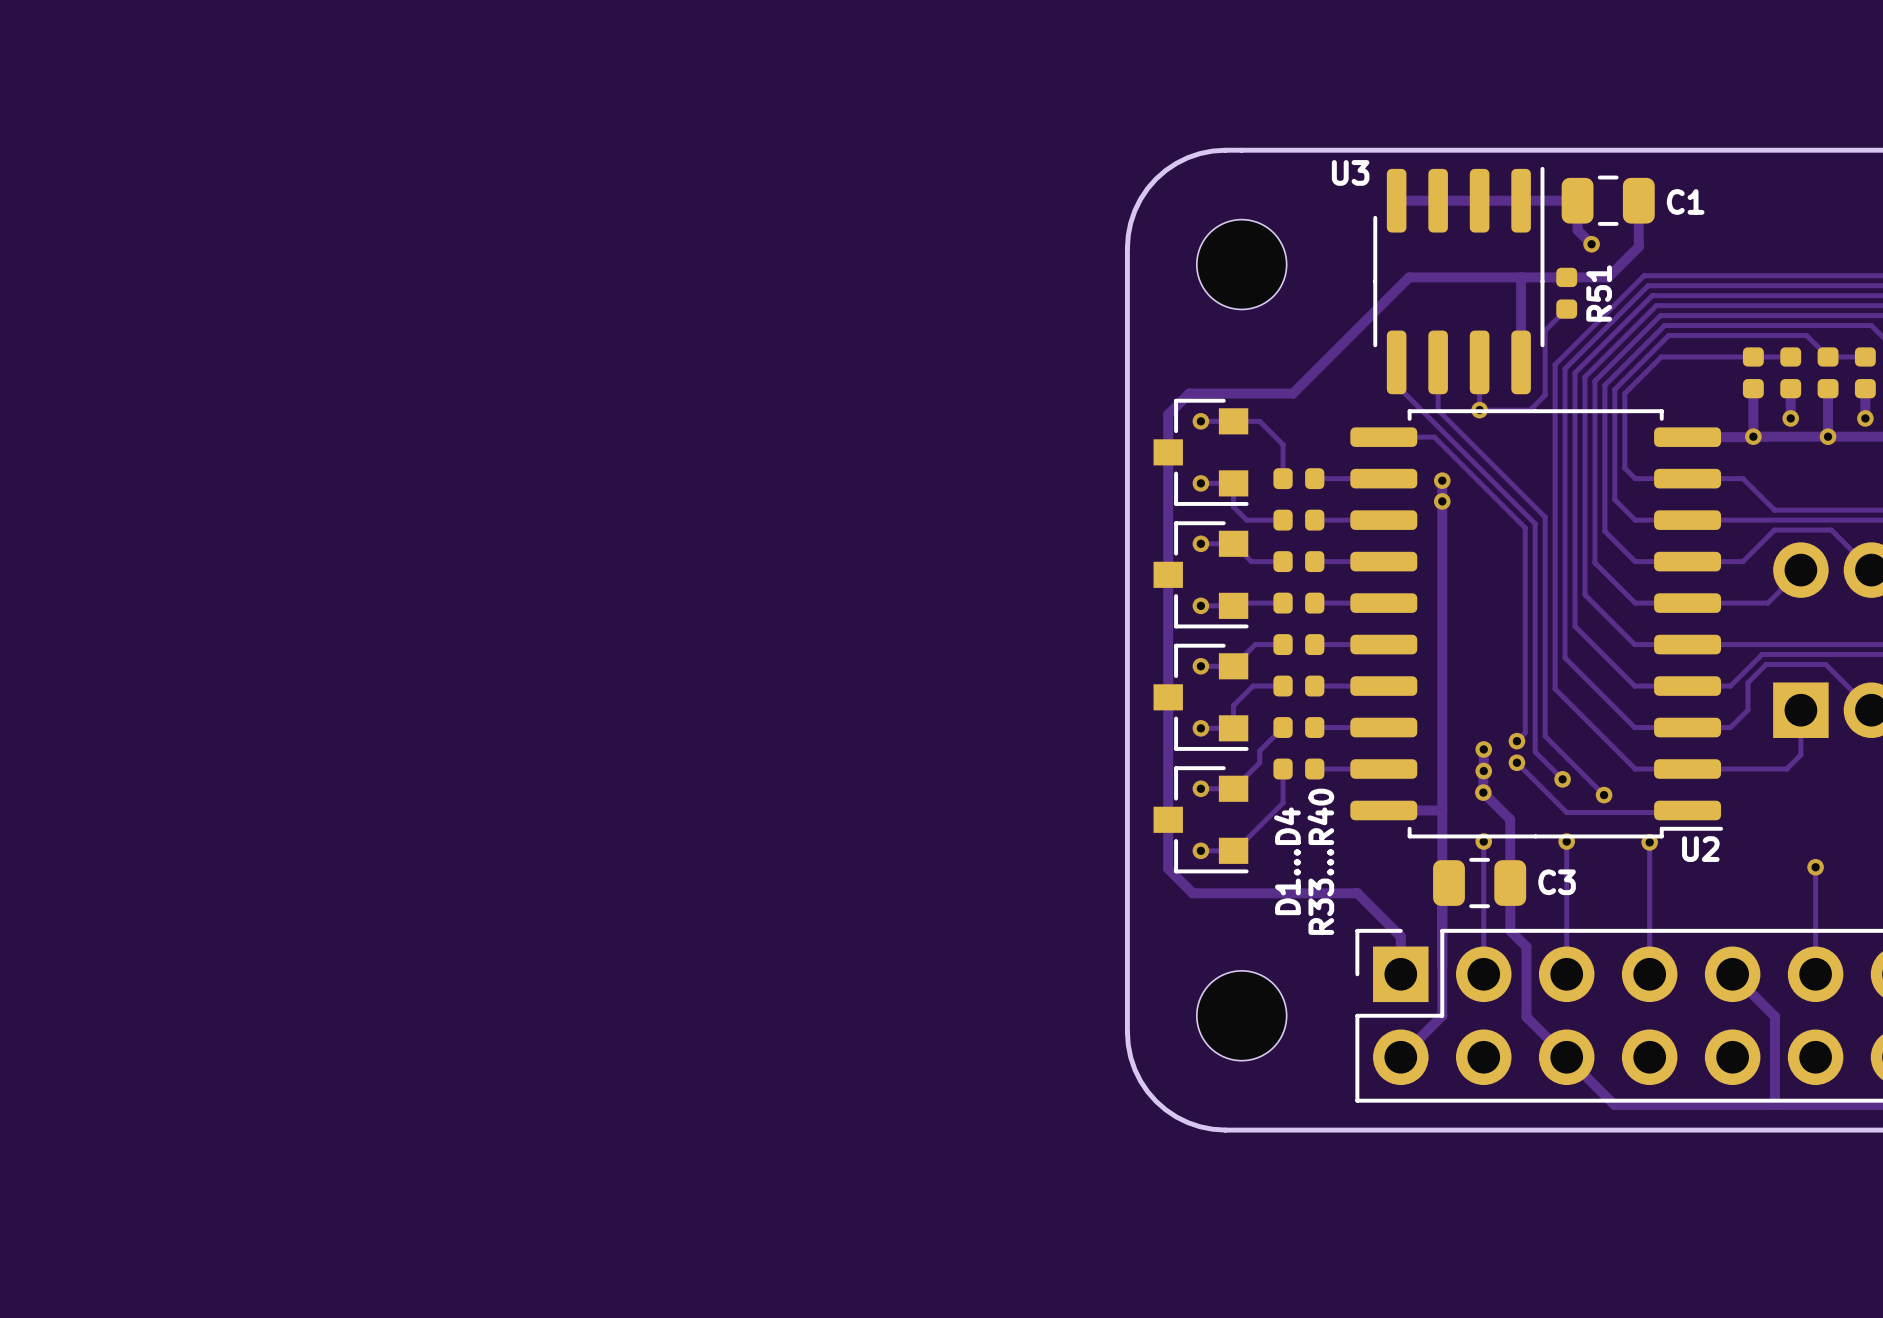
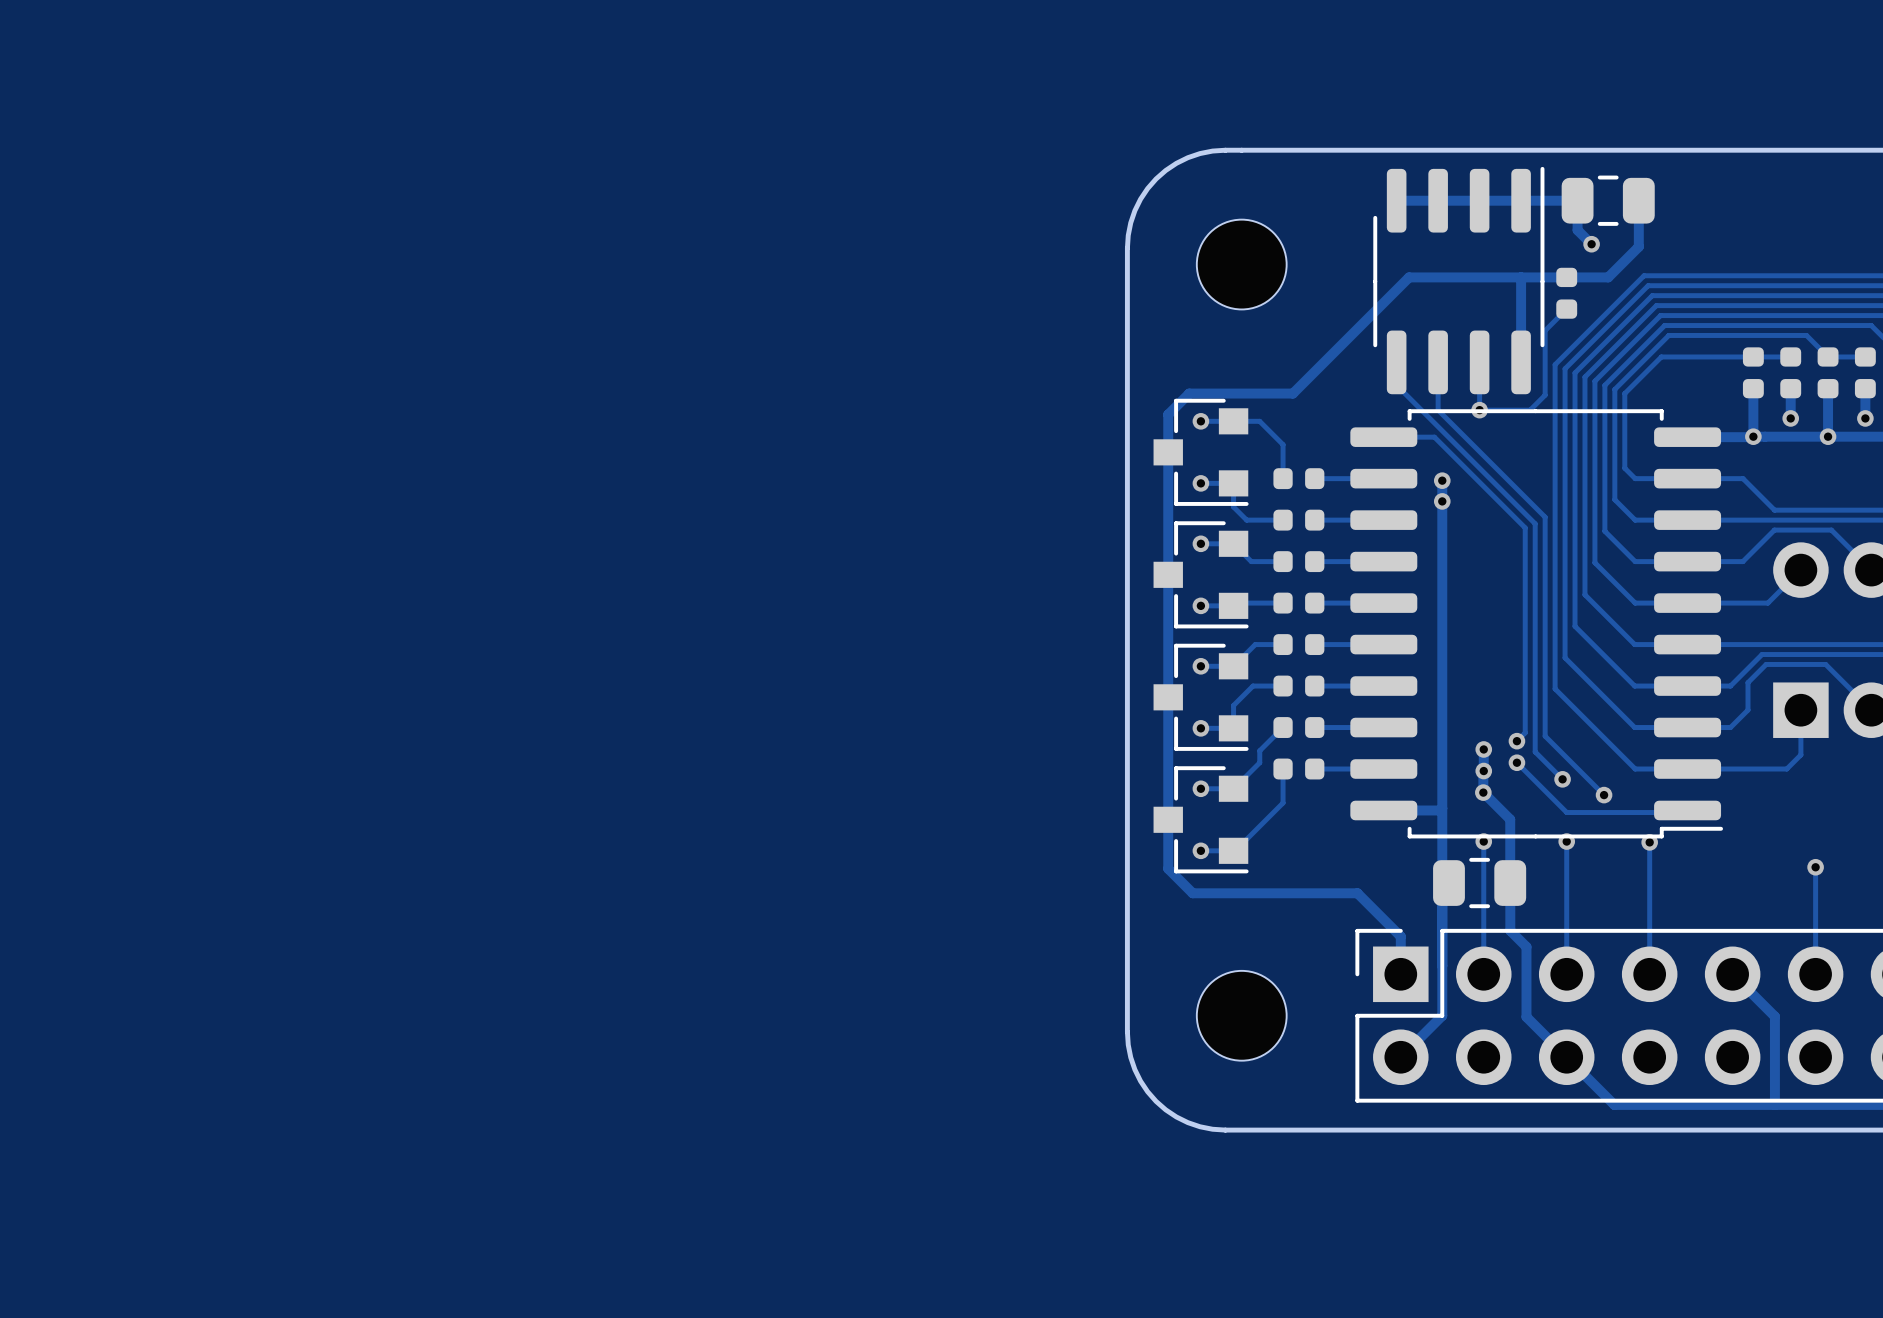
U3 name: U3 (1350, 172) -> none
C1 name: C1 (1685, 201) -> none
R51 name: R51 (1599, 293) -> none
U2 name: U2 (1700, 849) -> none
text: D1...D4 (1287, 861) -> none
text: R33...R40 (1320, 861) -> none
C3 name: C3 (1557, 882) -> none

